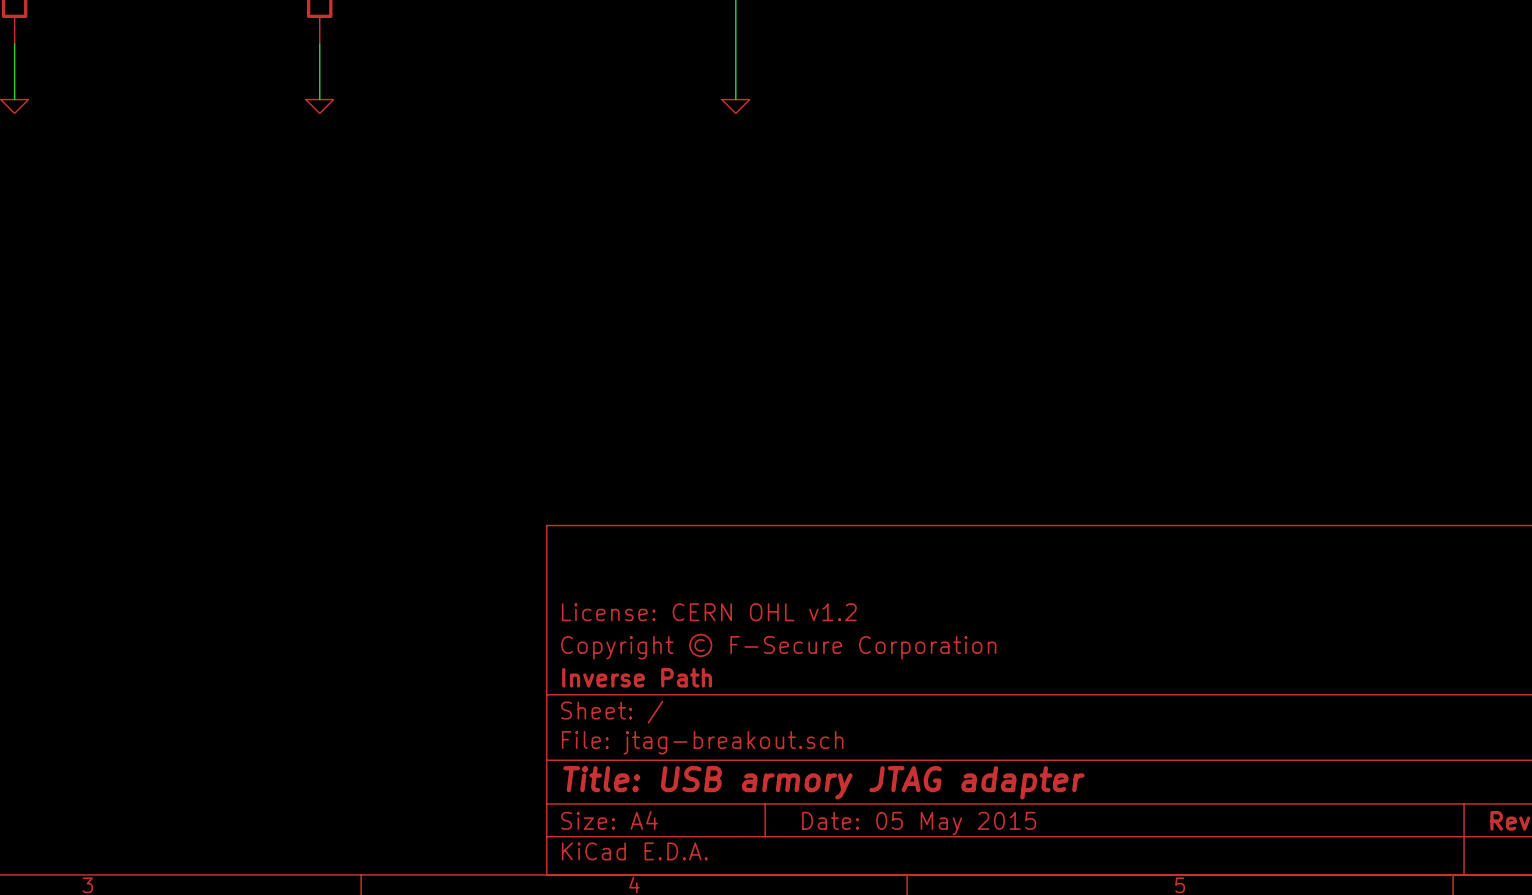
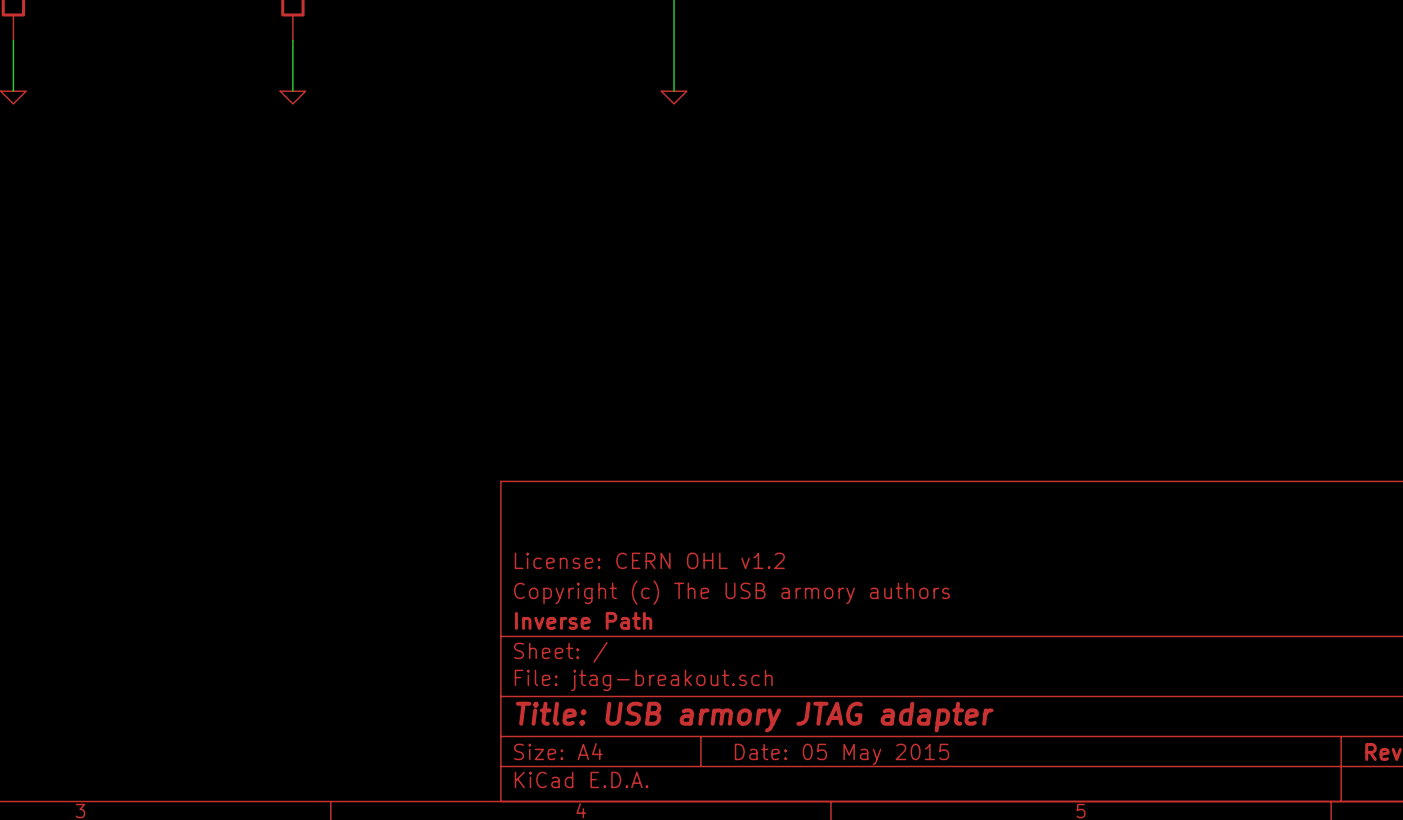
title block: Copyright © F-Secure Corporation (778, 646) -> Copyright (c) The USB armory authors (731, 592)

